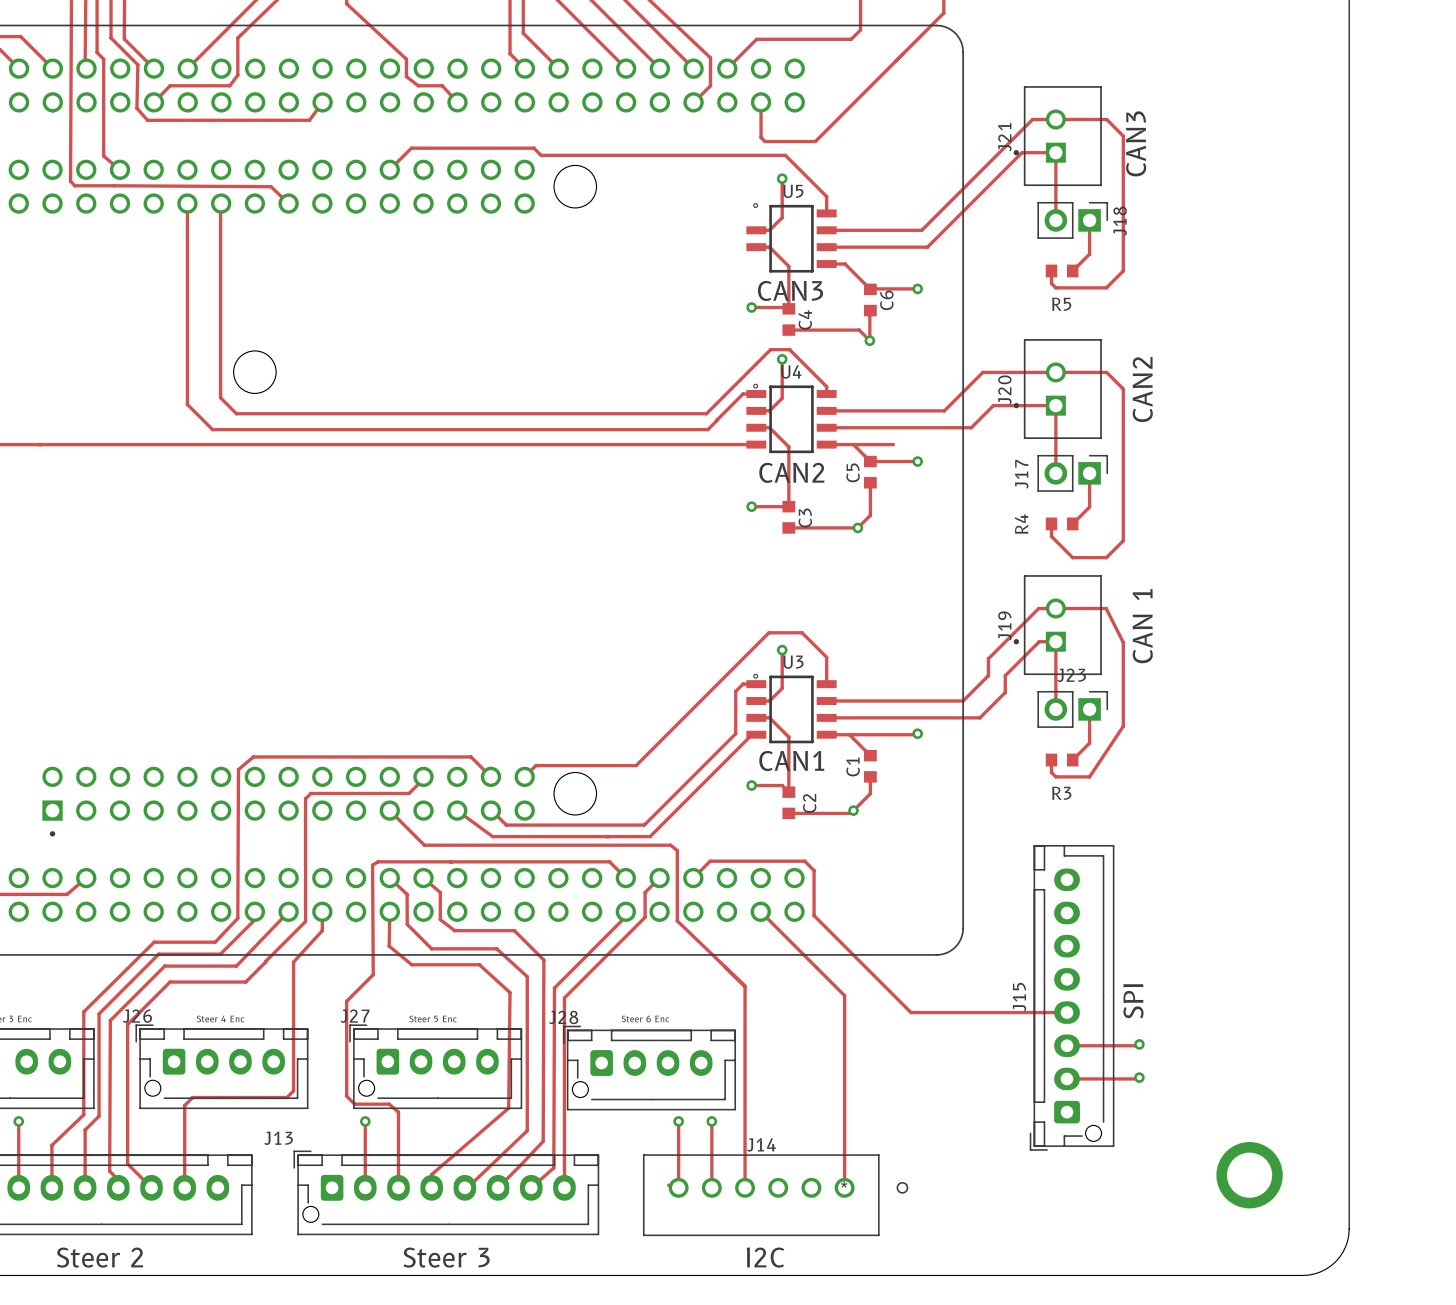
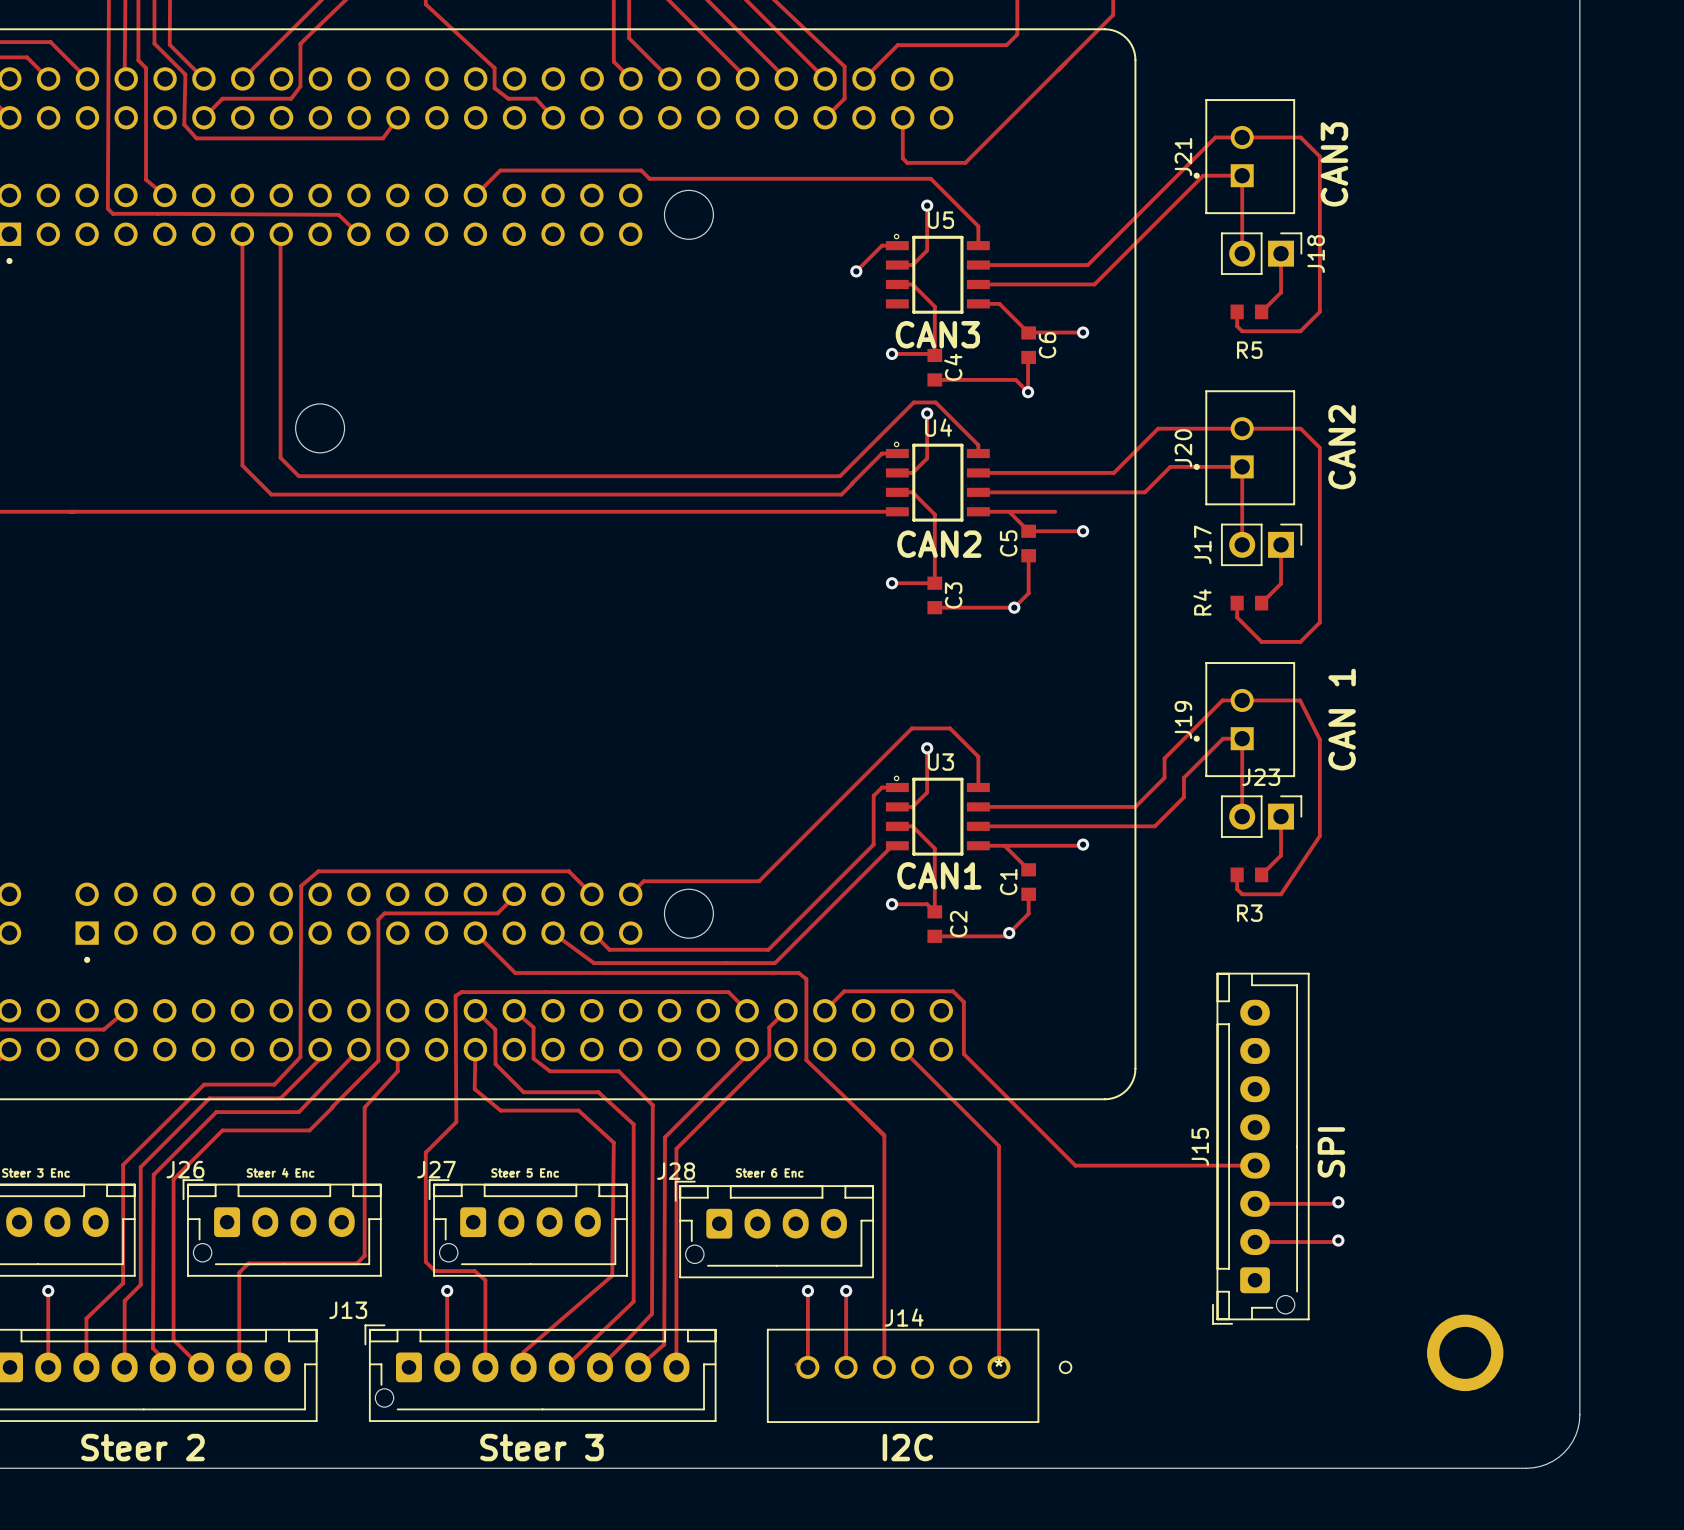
U5 footprint: [746, 203, 837, 273] -> [885, 234, 990, 314]
track: none -> (897, 245) (882, 245) (856, 271)
via: none -> (856, 271)

